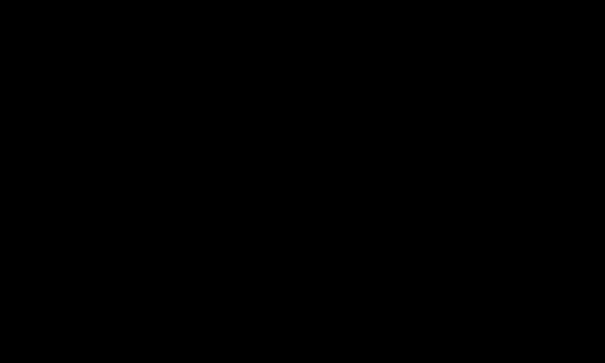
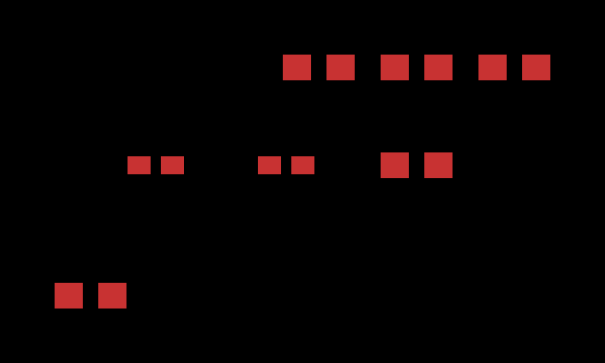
part: none -> (318, 67)
part: none -> (416, 67)
part: none -> (514, 67)
part: none -> (155, 165)
part: none -> (286, 165)
part: none -> (416, 165)
part: none -> (90, 295)

